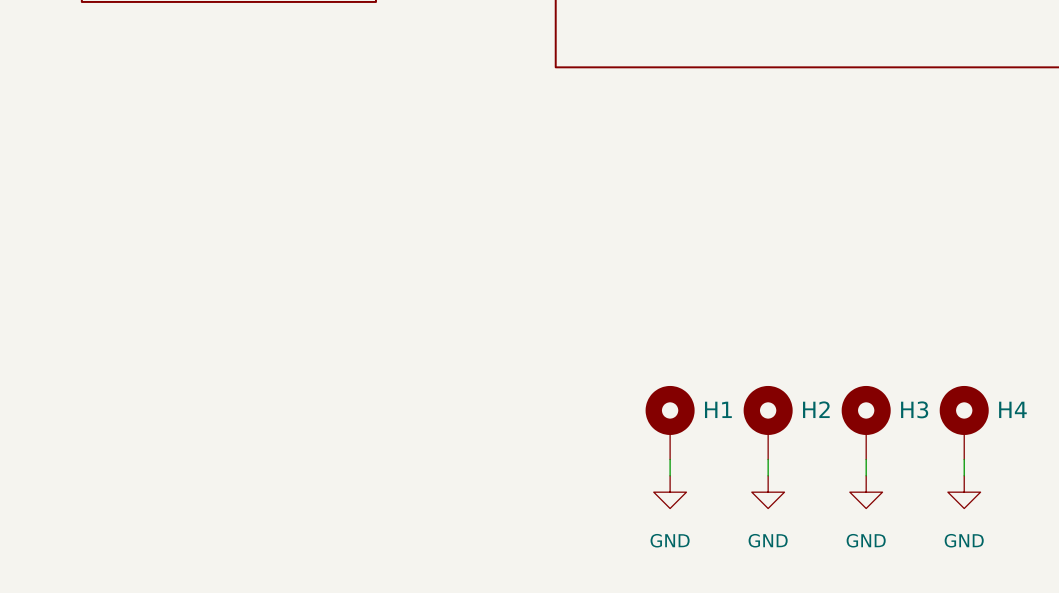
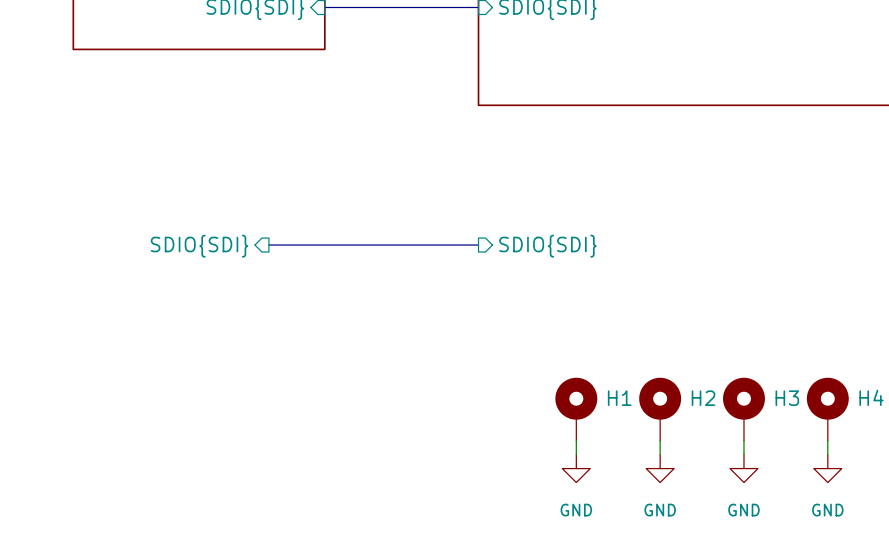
bus: none -> (268, 245) (478, 245)
sheet pin: none -> SDIO{SDI} (199, 246)
sheet pin: none -> SDIO{SDI} (547, 246)

